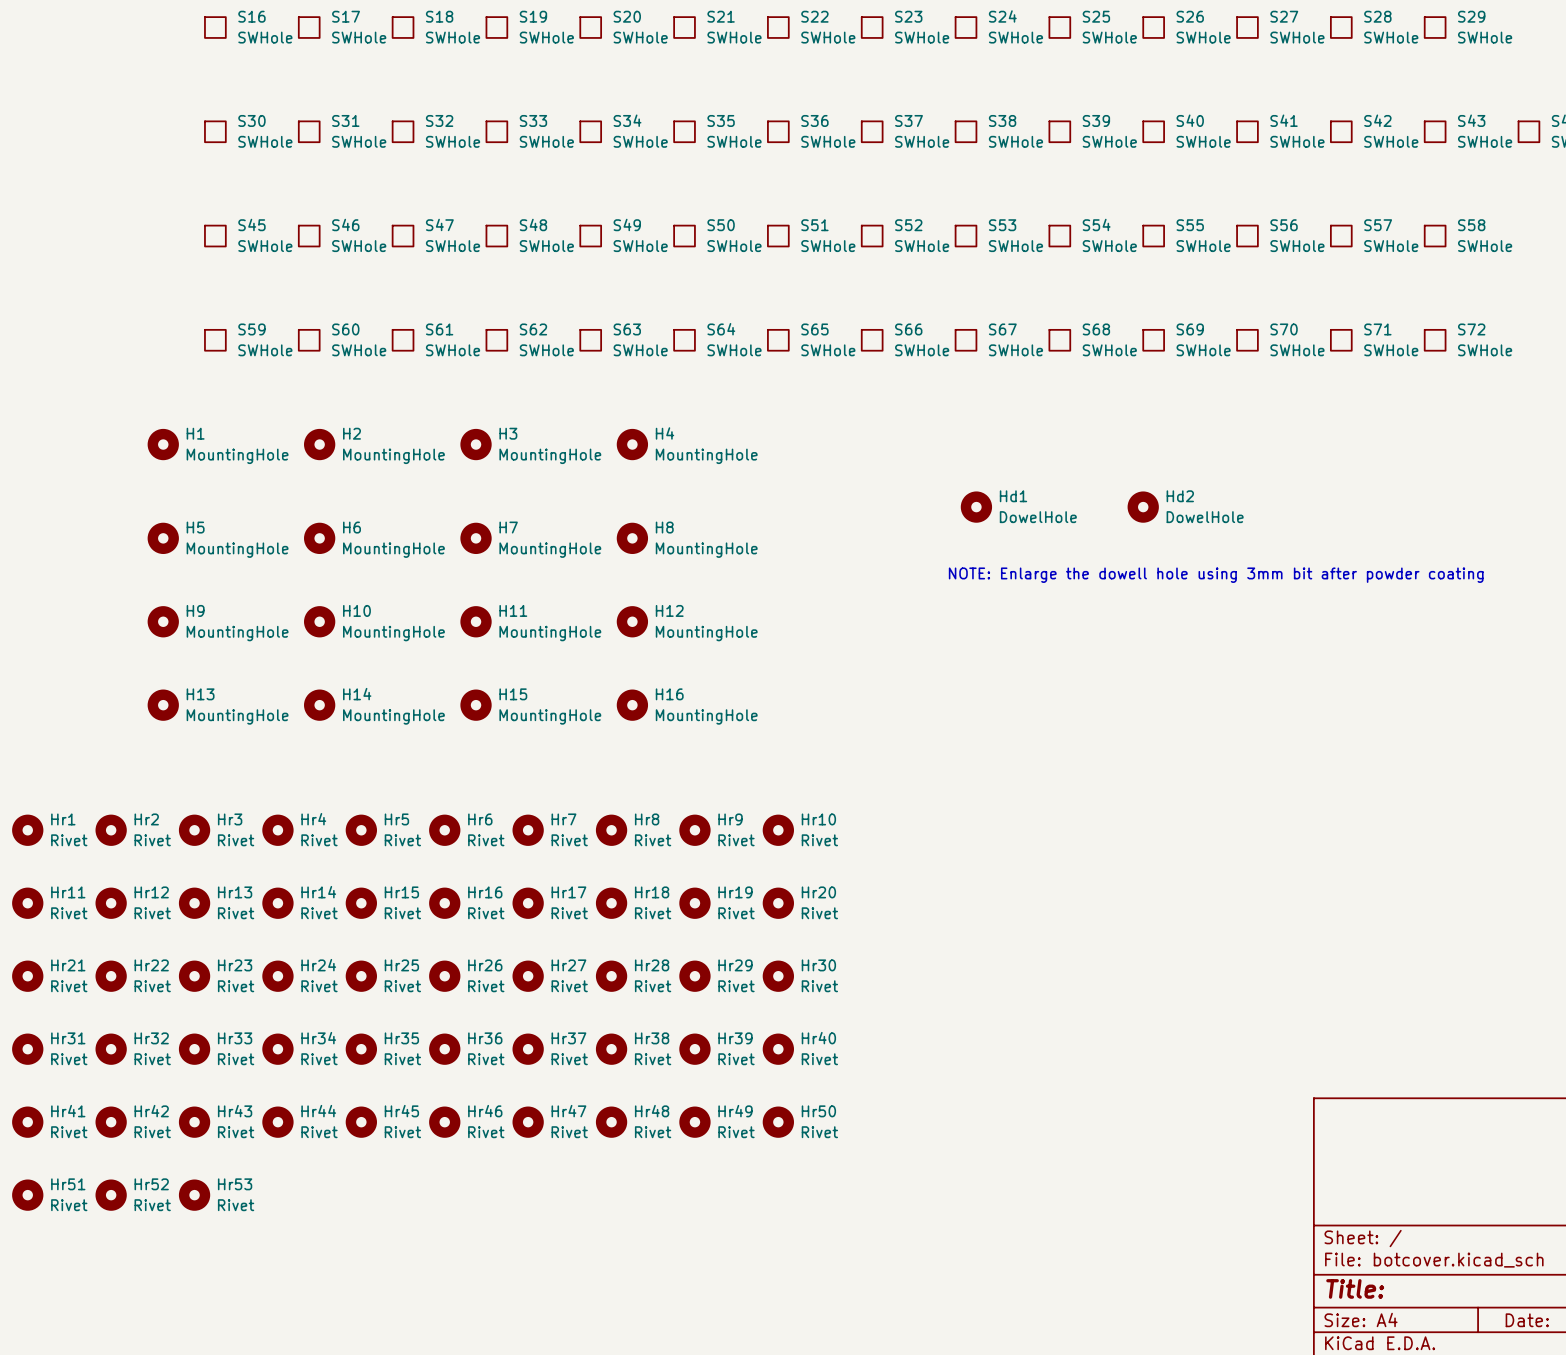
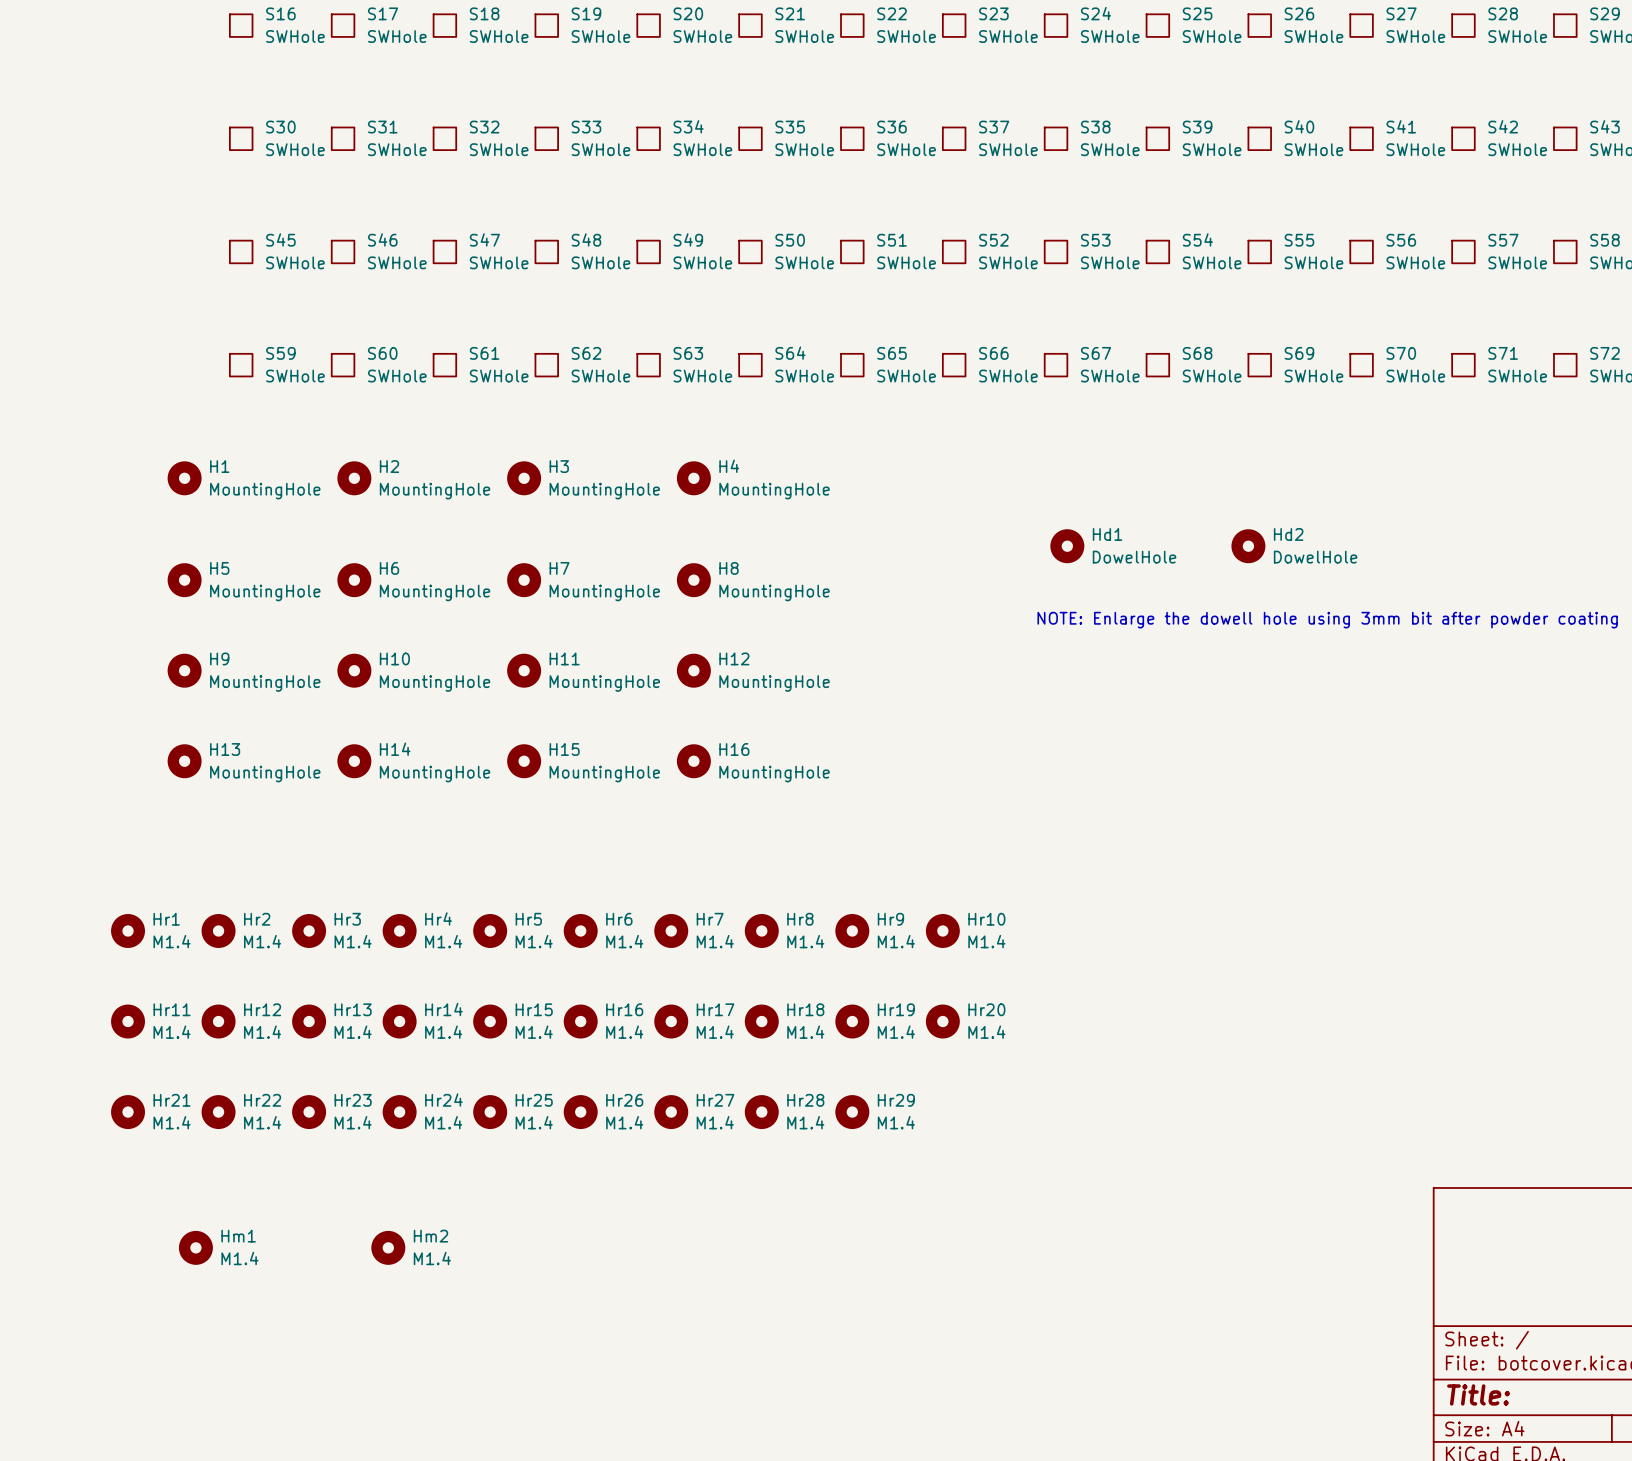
Hr1 position: (27, 830) -> (128, 930)
Hr2 position: (111, 830) -> (218, 930)
Hr3 position: (194, 830) -> (309, 930)
Hr4 position: (277, 830) -> (399, 930)
Hr5 position: (361, 830) -> (490, 930)
Hr6 position: (444, 830) -> (580, 930)
Hr7 position: (528, 830) -> (671, 930)
Hr8 position: (611, 830) -> (761, 930)
Hr9 position: (694, 830) -> (852, 930)
Hr10 position: (778, 830) -> (942, 930)
Hr1 value: Rivet (69, 840) -> M1.4 (172, 941)
Hr2 value: Rivet (152, 840) -> M1.4 (262, 941)
Hr3 value: Rivet (236, 840) -> M1.4 (353, 941)
Hr4 value: Rivet (319, 840) -> M1.4 (443, 941)
Hr5 value: Rivet (402, 840) -> M1.4 (534, 941)
Hr6 value: Rivet (486, 840) -> M1.4 (624, 941)
Hr7 value: Rivet (569, 840) -> M1.4 (715, 941)
Hr8 value: Rivet (653, 840) -> M1.4 (805, 941)
Hr9 value: Rivet (736, 840) -> M1.4 (896, 941)
Hr10 value: Rivet (819, 840) -> M1.4 (986, 941)
Hr11 position: (27, 903) -> (128, 1021)
Hr12 position: (111, 903) -> (218, 1021)
Hr13 position: (194, 903) -> (309, 1021)
Hr14 position: (277, 903) -> (399, 1021)
Hr15 position: (361, 903) -> (490, 1021)
Hr16 position: (444, 903) -> (580, 1021)
Hr17 position: (528, 903) -> (671, 1021)
Hr18 position: (611, 903) -> (761, 1021)
Hr19 position: (694, 903) -> (852, 1021)
Hr20 position: (778, 903) -> (942, 1021)
Hr11 value: Rivet (69, 913) -> M1.4 (172, 1032)
Hr12 value: Rivet (152, 913) -> M1.4 (262, 1032)
Hr13 value: Rivet (236, 913) -> M1.4 (353, 1032)
Hr14 value: Rivet (319, 913) -> M1.4 (443, 1032)
Hr15 value: Rivet (402, 913) -> M1.4 (534, 1032)
Hr16 value: Rivet (486, 913) -> M1.4 (624, 1032)
Hr17 value: Rivet (569, 913) -> M1.4 (715, 1032)
Hr18 value: Rivet (653, 913) -> M1.4 (805, 1032)
Hr19 value: Rivet (736, 913) -> M1.4 (896, 1032)
Hr20 value: Rivet (819, 913) -> M1.4 (986, 1032)
Hr21 position: (27, 976) -> (128, 1112)
Hr22 position: (111, 976) -> (218, 1112)
Hr23 position: (194, 976) -> (309, 1112)
Hr24 position: (277, 976) -> (399, 1112)
Hr25 position: (361, 976) -> (490, 1112)
Hr26 position: (444, 976) -> (580, 1112)
Hr27 position: (528, 976) -> (671, 1112)
Hr28 position: (611, 976) -> (761, 1112)
Hr29 position: (694, 976) -> (852, 1112)
Hr30: Rivet (778, 976) -> none
Hr21 value: Rivet (69, 986) -> M1.4 (172, 1122)
Hr22 value: Rivet (152, 986) -> M1.4 (262, 1122)
Hr23 value: Rivet (236, 986) -> M1.4 (353, 1122)
Hr24 value: Rivet (319, 986) -> M1.4 (443, 1122)
Hr25 value: Rivet (402, 986) -> M1.4 (534, 1122)
Hr26 value: Rivet (486, 986) -> M1.4 (624, 1122)
Hr27 value: Rivet (569, 986) -> M1.4 (715, 1122)
Hr28 value: Rivet (653, 986) -> M1.4 (805, 1122)
Hr29 value: Rivet (736, 986) -> M1.4 (896, 1122)
Hr31: Rivet (27, 1049) -> none
Hr32: Rivet (111, 1049) -> none
Hr33: Rivet (194, 1049) -> none
Hr34: Rivet (277, 1049) -> none
Hr35: Rivet (361, 1049) -> none
Hr36: Rivet (444, 1049) -> none
Hr37: Rivet (528, 1049) -> none
Hr38: Rivet (611, 1049) -> none
Hr39: Rivet (694, 1049) -> none
Hr40: Rivet (778, 1049) -> none
Hr41: Rivet (27, 1122) -> none
Hr42: Rivet (111, 1122) -> none
Hr43: Rivet (194, 1122) -> none
Hr44: Rivet (277, 1122) -> none
Hr45: Rivet (361, 1122) -> none
Hr46: Rivet (444, 1122) -> none
Hr47: Rivet (528, 1122) -> none
Hr48: Rivet (611, 1122) -> none
Hr49: Rivet (694, 1122) -> none
Hr50: Rivet (778, 1122) -> none
Hm1: none -> M1.4 (195, 1247)
Hm2: none -> M1.4 (388, 1247)
Hr51: Rivet (27, 1195) -> none
Hr52: Rivet (111, 1195) -> none
Hr53: Rivet (194, 1195) -> none

